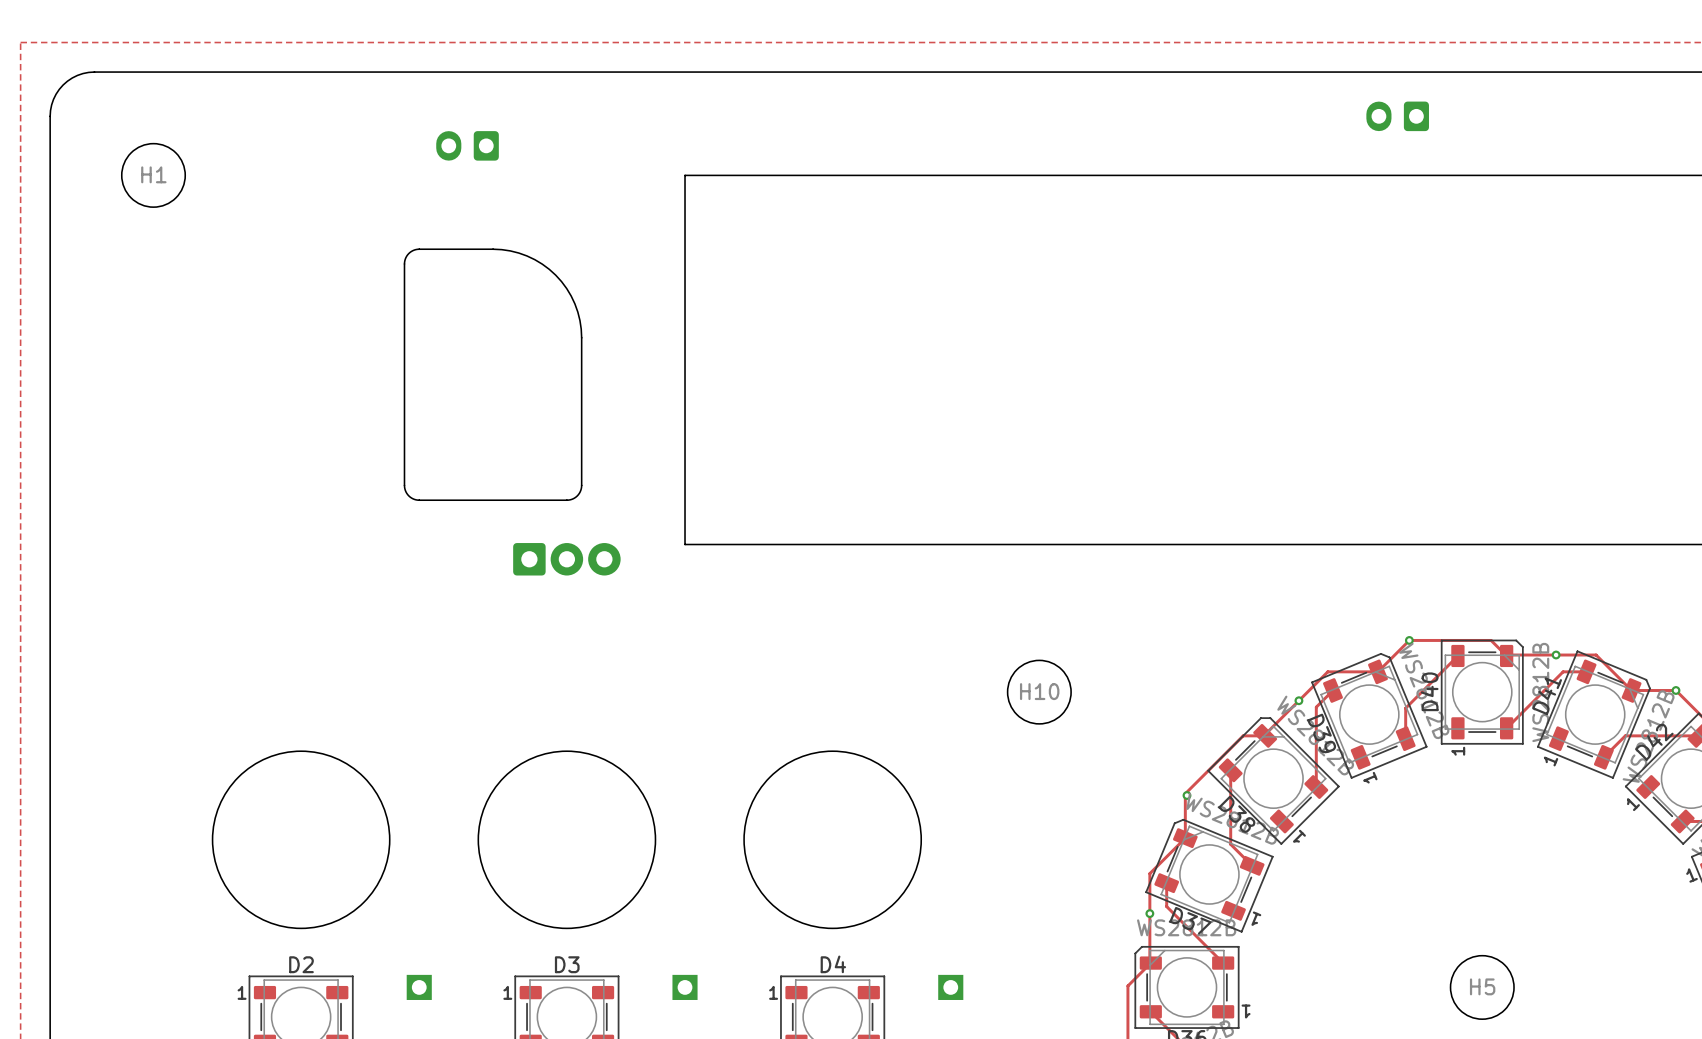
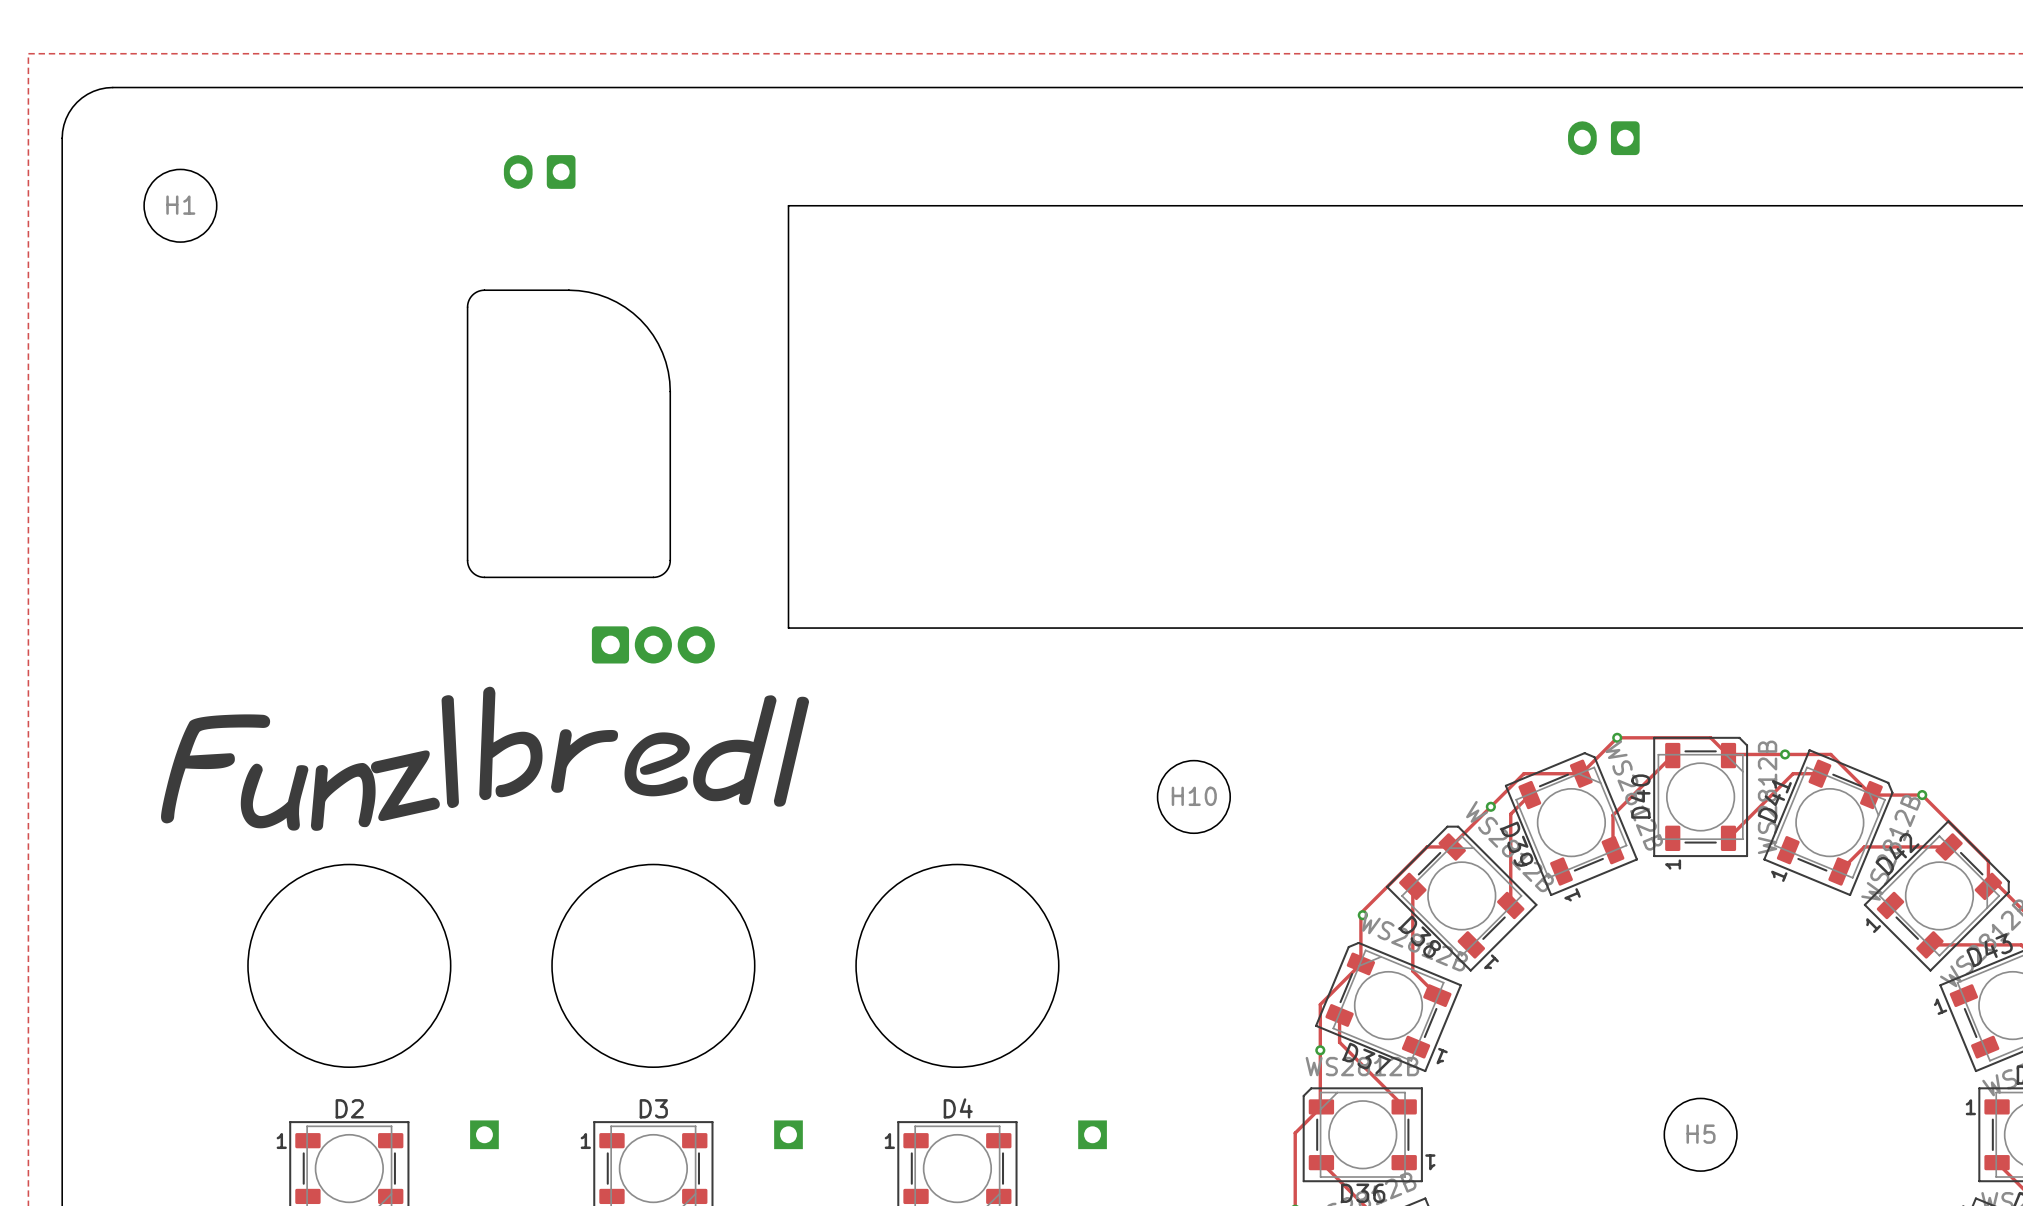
drawing: none -> [479, 686, 810, 807]
drawing: none -> [161, 695, 459, 831]

